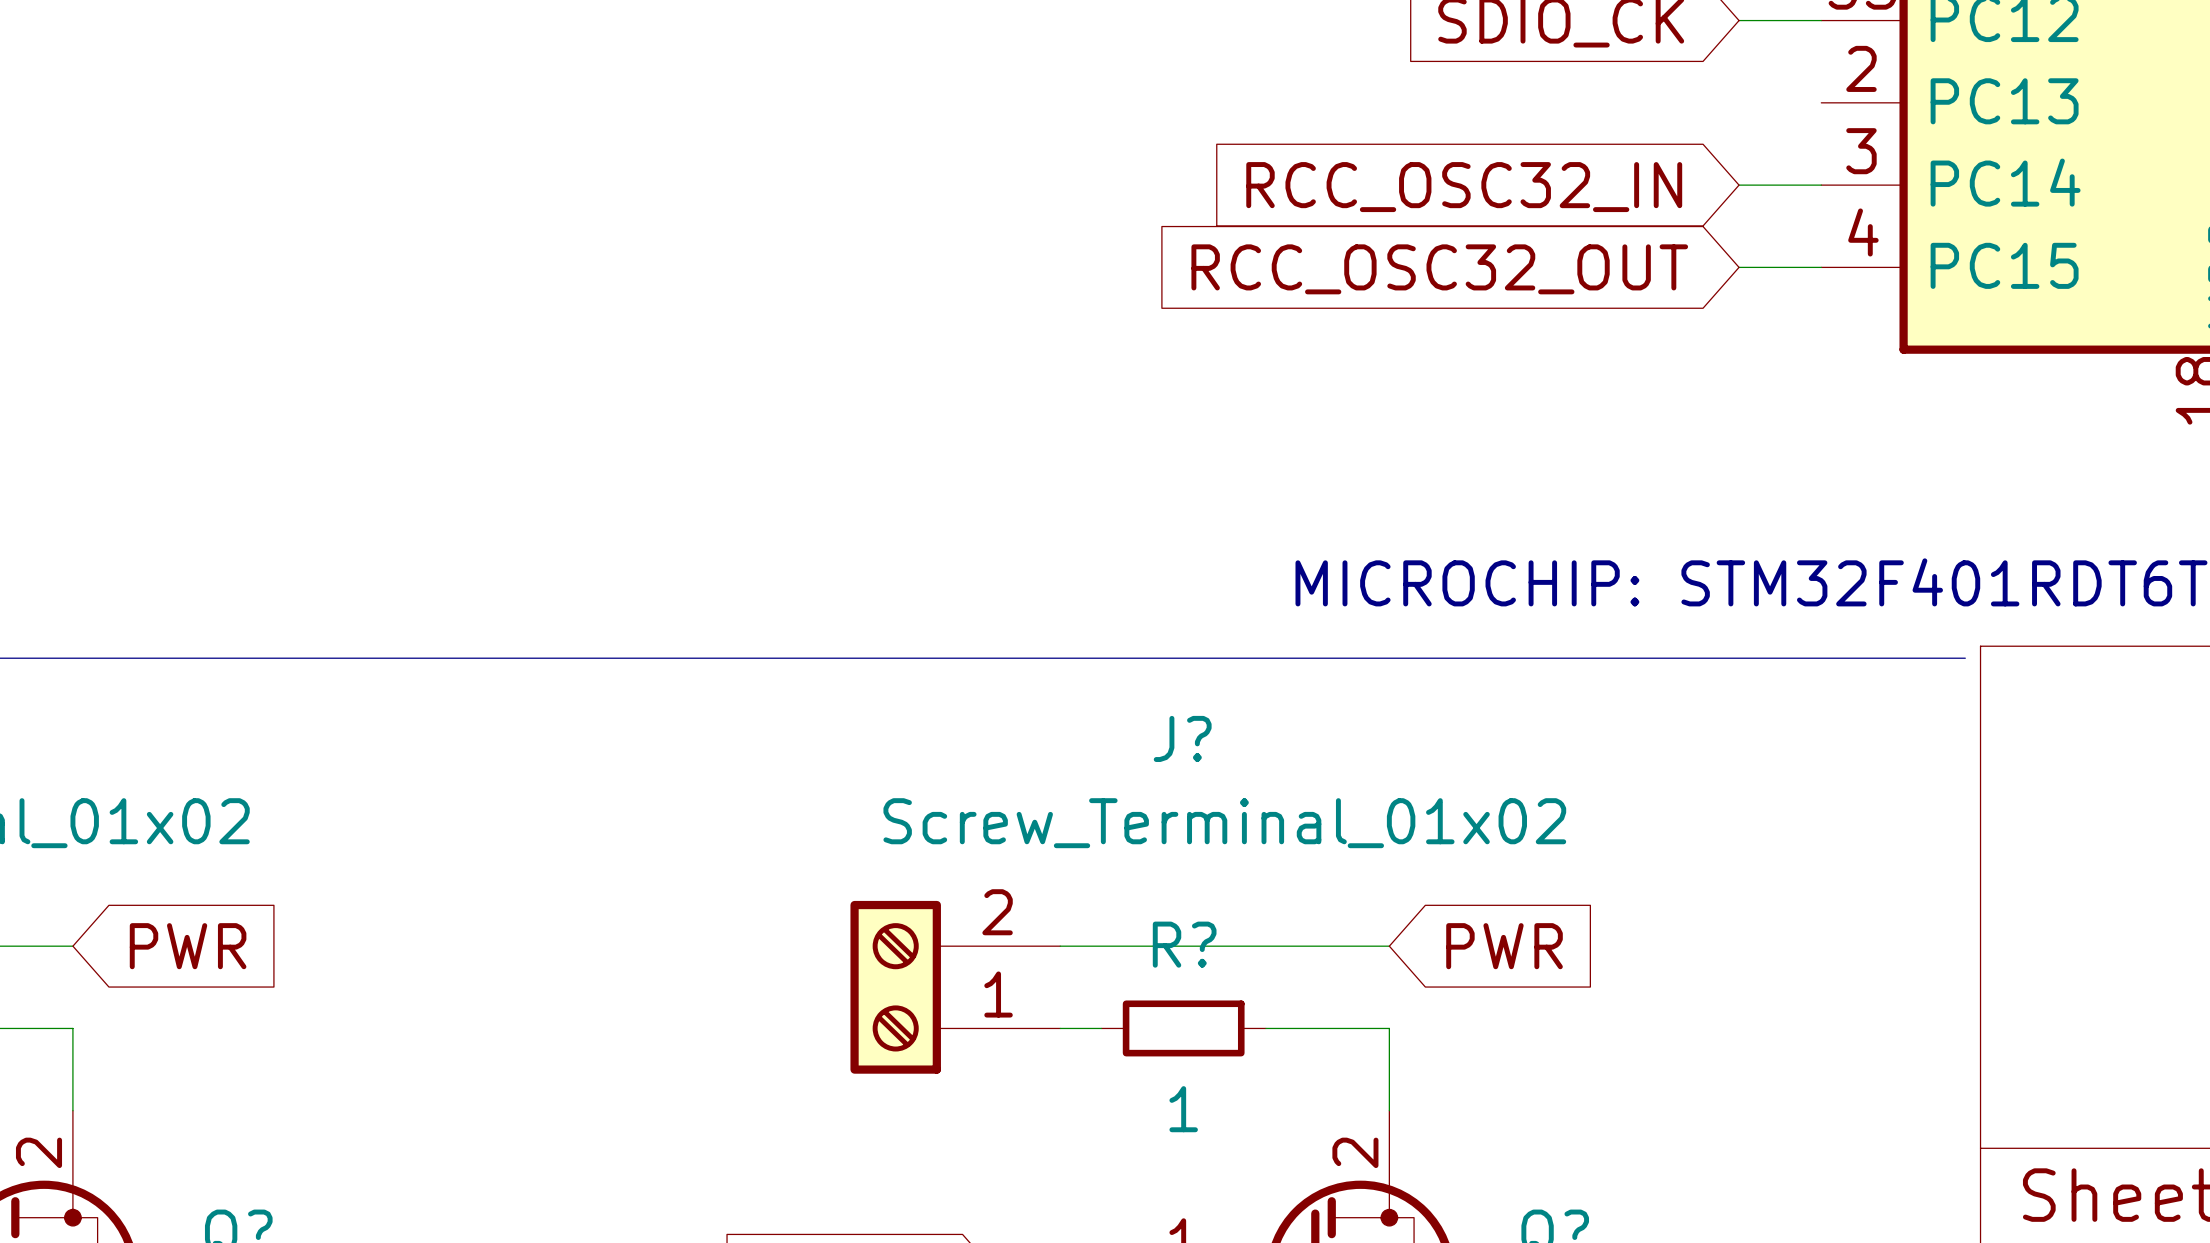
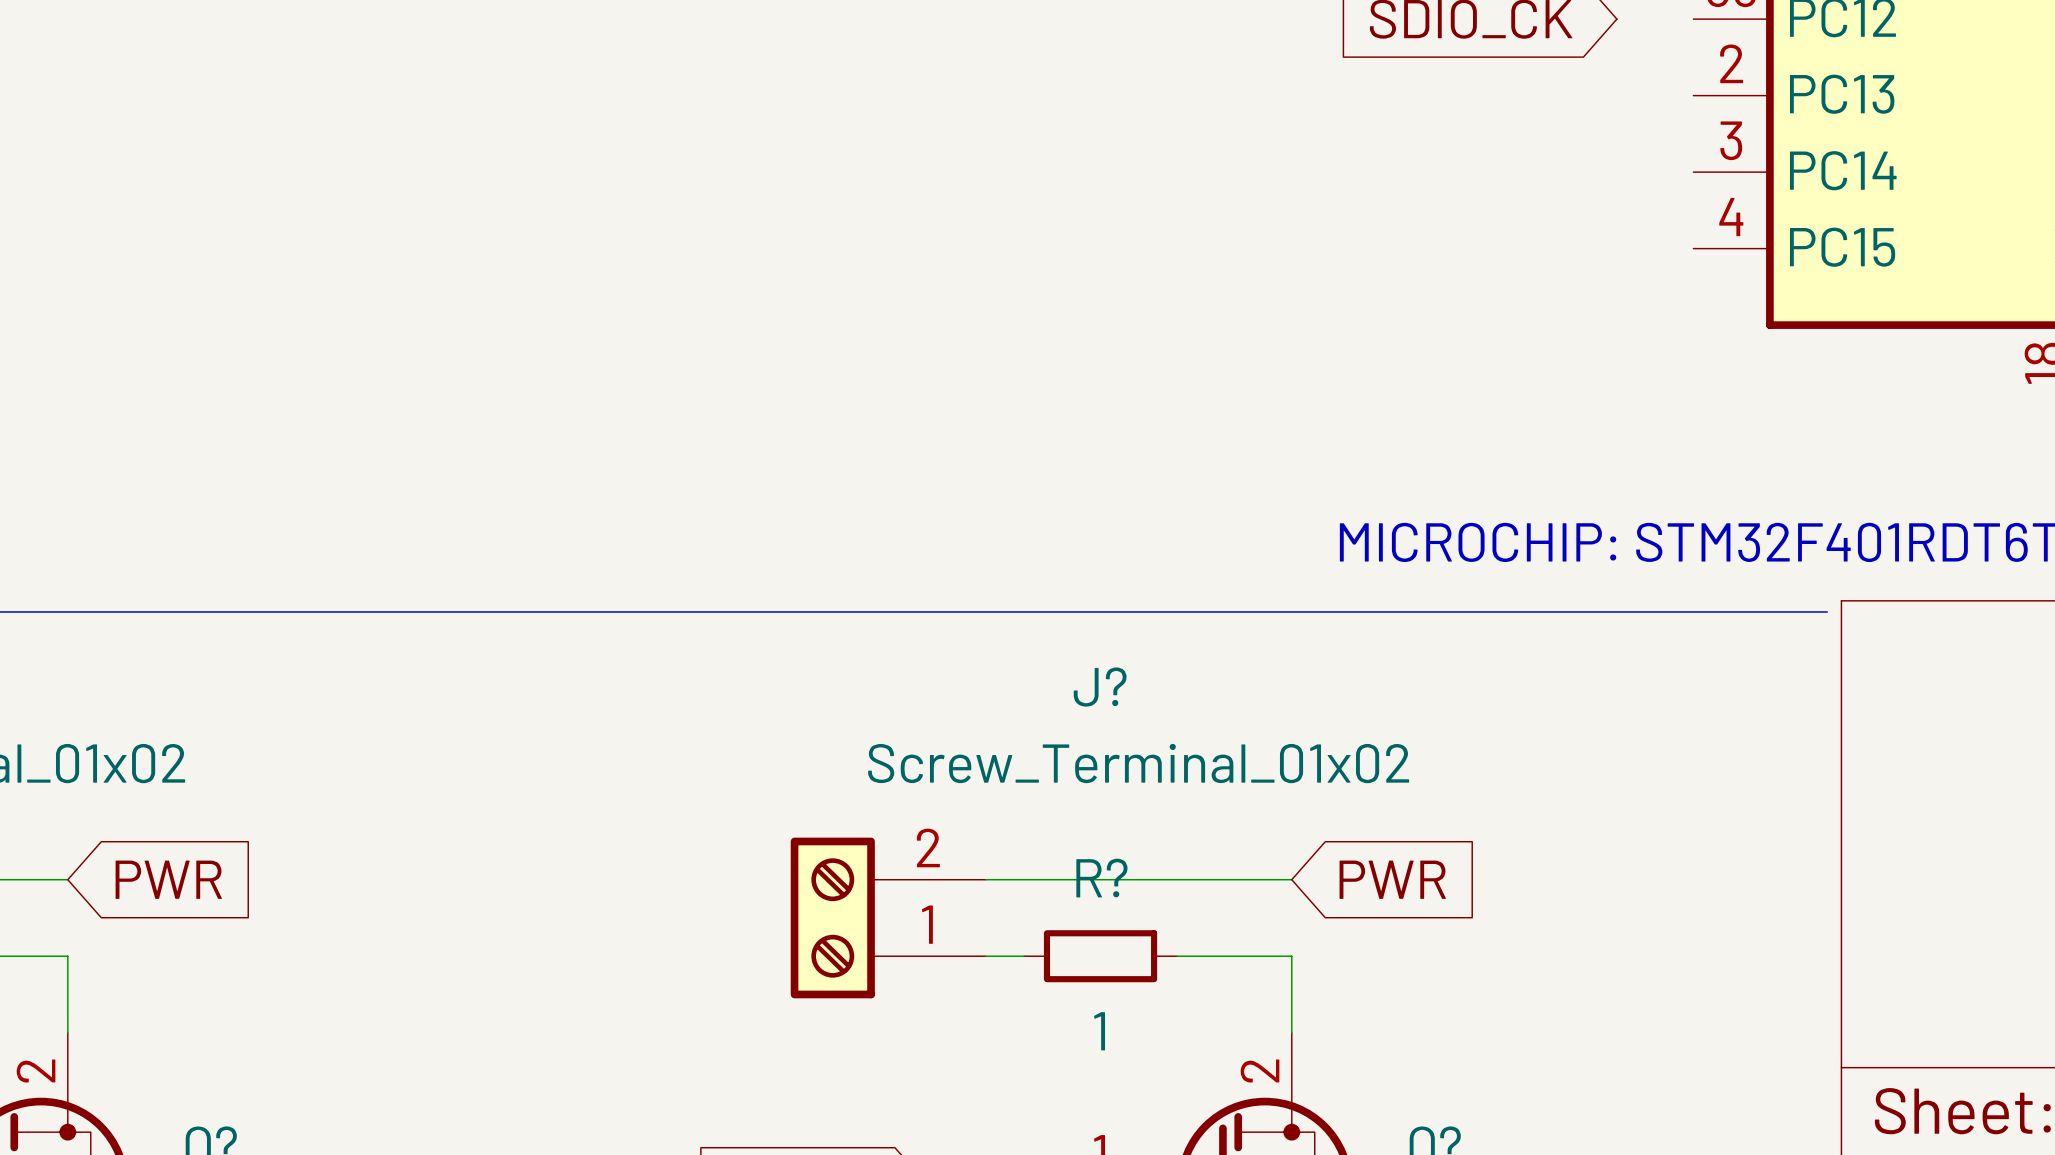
wire: (1739, 20) (1821, 20) -> none
wire: (1739, 185) (1821, 185) -> none
global label: RCC_OSC32_IN (1464, 187) -> none
wire: (1739, 267) (1821, 267) -> none
global label: RCC_OSC32_OUT (1439, 269) -> none

